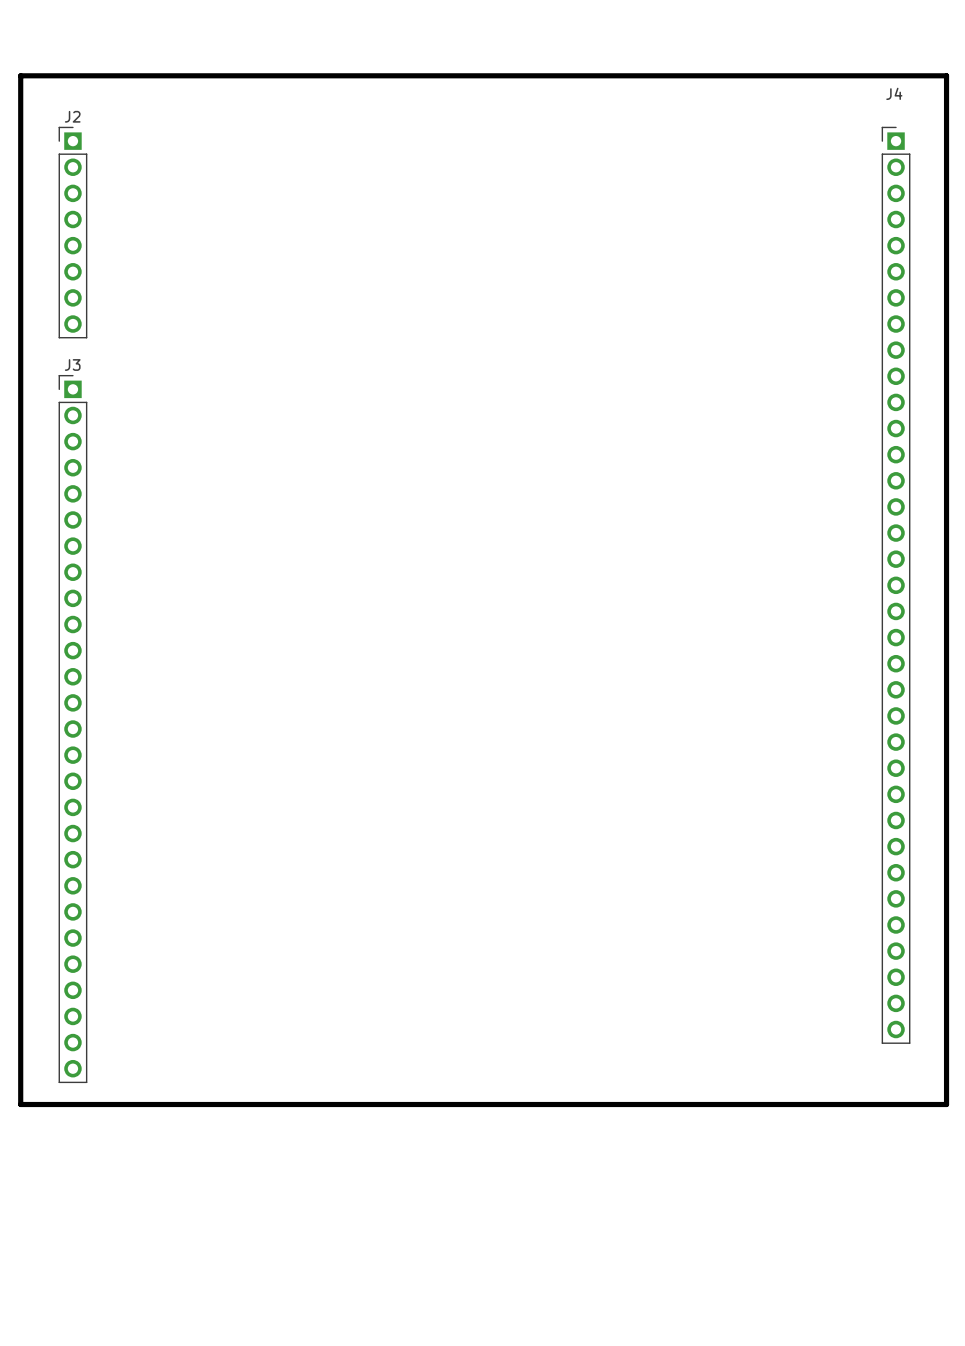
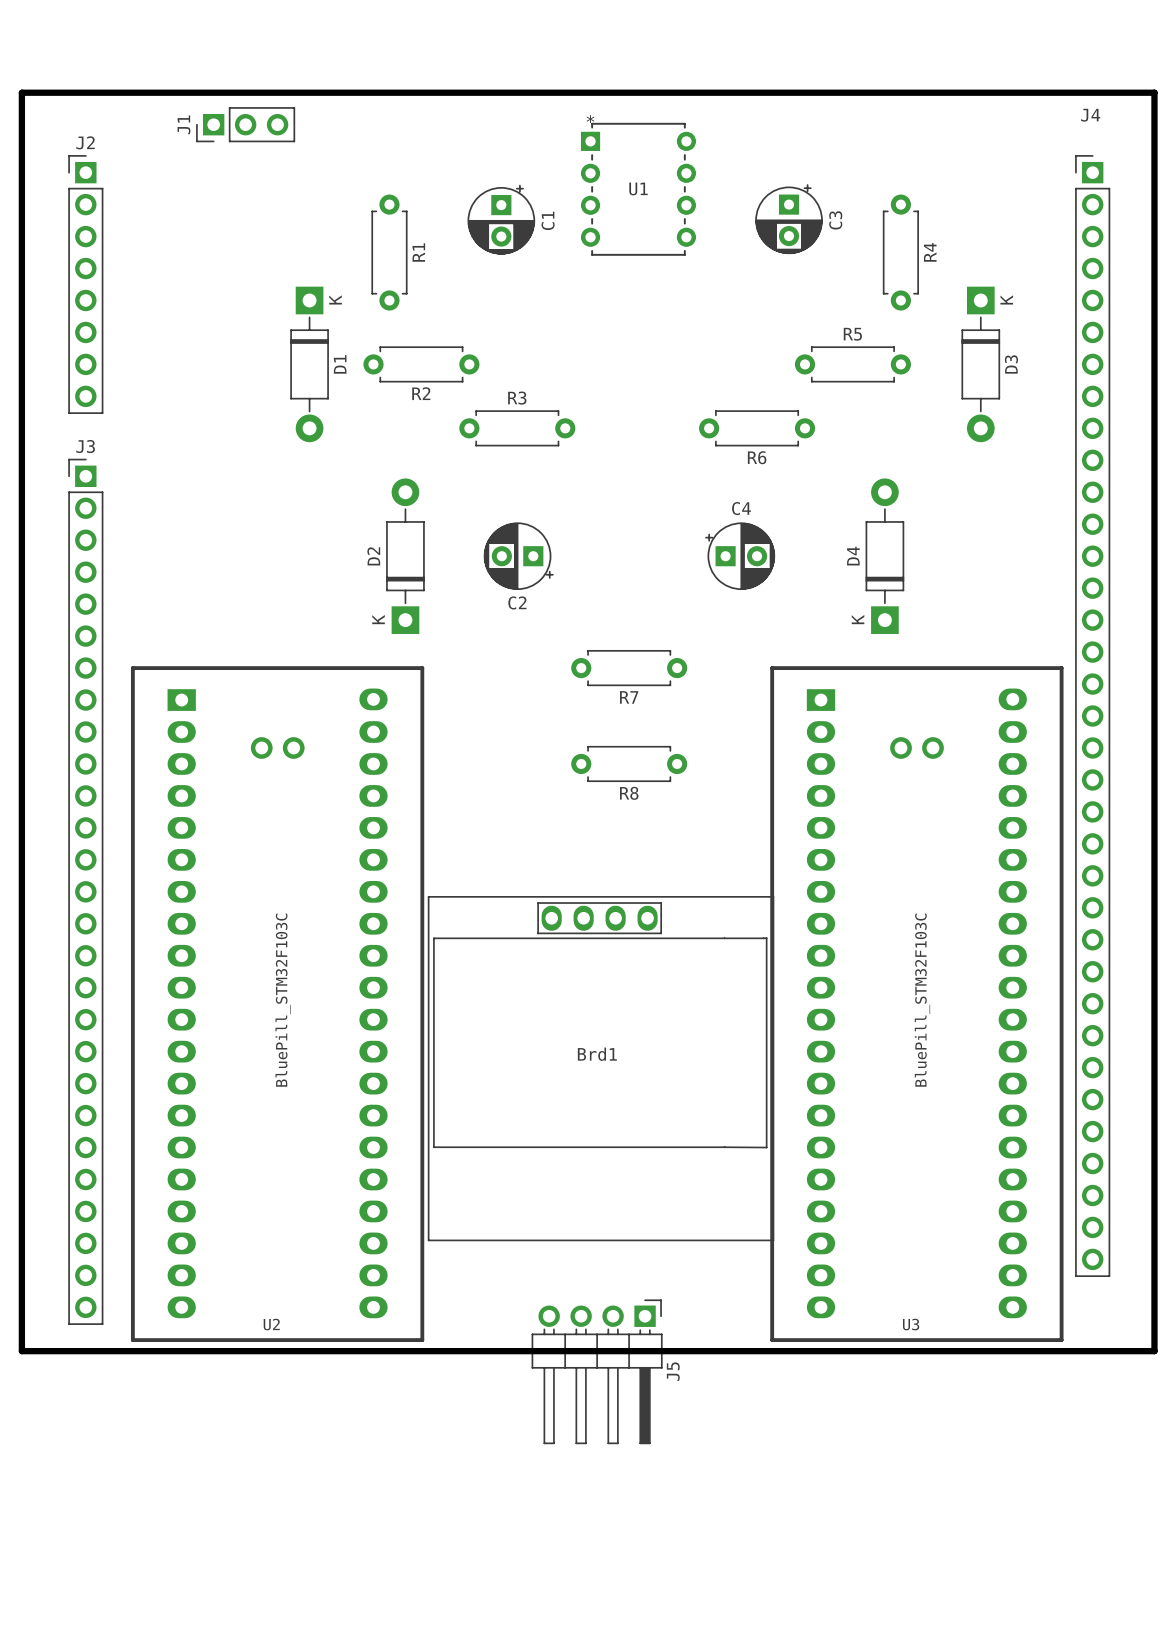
J1: none -> (245, 124)
U1: none -> (638, 189)
C1: none -> (501, 219)
C3: none -> (789, 219)
R1: none -> (389, 252)
R4: none -> (900, 252)
D1: none -> (309, 364)
R2: none -> (421, 364)
R5: none -> (852, 364)
D3: none -> (980, 364)
R3: none -> (517, 428)
R6: none -> (757, 428)
D2: none -> (405, 556)
C2: none -> (518, 556)
C4: none -> (740, 556)
D4: none -> (884, 556)
R7: none -> (629, 668)
R8: none -> (629, 763)
U2: none -> BluePill_STM32F103C (277, 1004)
U3: none -> BluePill_STM32F103C (916, 1004)
Brd1: none -> (601, 1068)
J5: none -> (597, 1371)

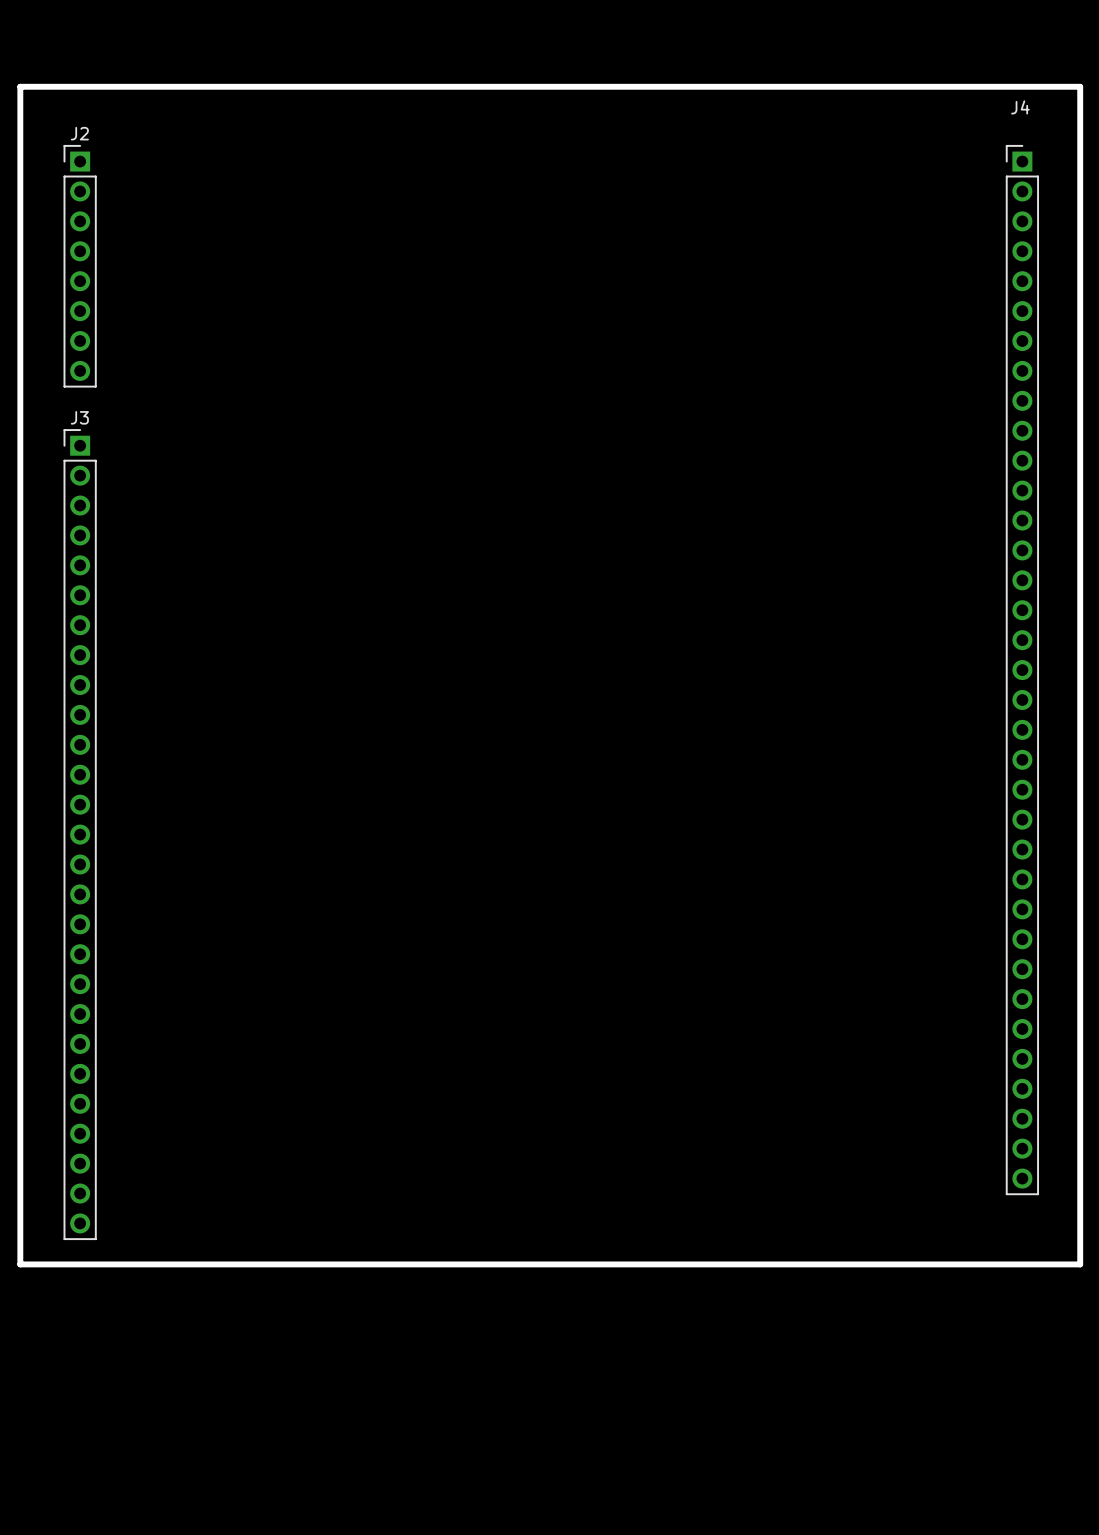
J1: (245, 124) -> none
U1: (638, 189) -> none
C1: (501, 219) -> none
C3: (789, 219) -> none
R1: (389, 252) -> none
R4: (900, 252) -> none
D1: (309, 364) -> none
R2: (421, 364) -> none
R5: (852, 364) -> none
D3: (980, 364) -> none
R3: (517, 428) -> none
R6: (757, 428) -> none
D2: (405, 556) -> none
C2: (518, 556) -> none
C4: (740, 556) -> none
D4: (884, 556) -> none
R7: (629, 668) -> none
R8: (629, 763) -> none
U2: BluePill_STM32F103C (277, 1004) -> none
U3: BluePill_STM32F103C (916, 1004) -> none
Brd1: (601, 1068) -> none
J5: (597, 1371) -> none

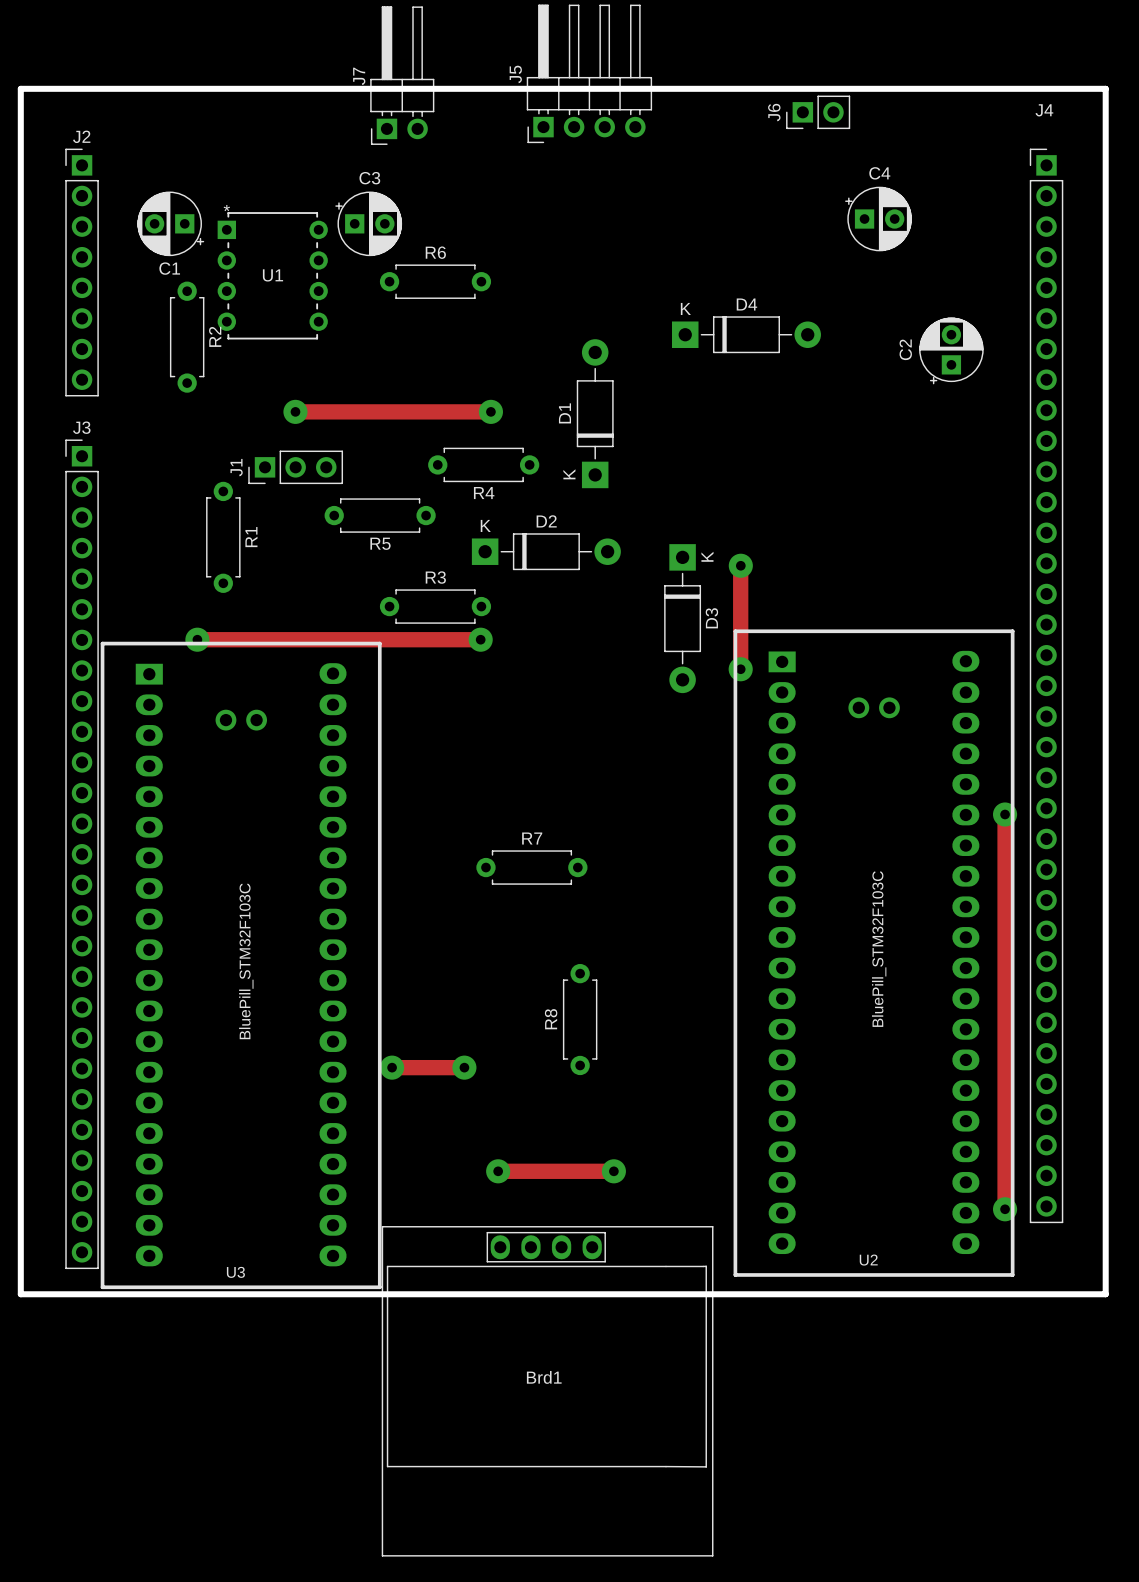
J5: none -> (589, 73)
J7: none -> (402, 75)
J6: none -> (818, 112)
C4: none -> (878, 219)
C1: none -> (170, 223)
C3: none -> (368, 223)
U1: none -> (272, 275)
R6: none -> (435, 281)
D4: none -> (746, 334)
R2: none -> (187, 337)
C2: none -> (951, 350)
track: none -> (295, 411) (490, 411)
via: none -> (295, 411)
via: none -> (490, 411)
D1: none -> (595, 413)
R4: none -> (483, 464)
J1: none -> (295, 467)
R5: none -> (380, 515)
R1: none -> (223, 537)
D2: none -> (546, 551)
track: none -> (740, 565) (740, 669)
via: none -> (740, 565)
R3: none -> (435, 606)
D3: none -> (682, 618)
track: none -> (197, 639) (480, 639)
via: none -> (197, 639)
via: none -> (480, 639)
via: none -> (740, 669)
track: none -> (1005, 814) (1005, 1209)
via: none -> (1005, 814)
R7: none -> (531, 867)
U2: none -> BluePill_STM32F103C (874, 953)
U3: none -> BluePill_STM32F103C (241, 965)
R8: none -> (580, 1019)
track: none -> (392, 1067) (464, 1067)
via: none -> (392, 1067)
via: none -> (464, 1067)
track: none -> (498, 1171) (613, 1171)
via: none -> (498, 1171)
via: none -> (613, 1171)
via: none -> (1005, 1209)
Brd1: none -> (547, 1391)

